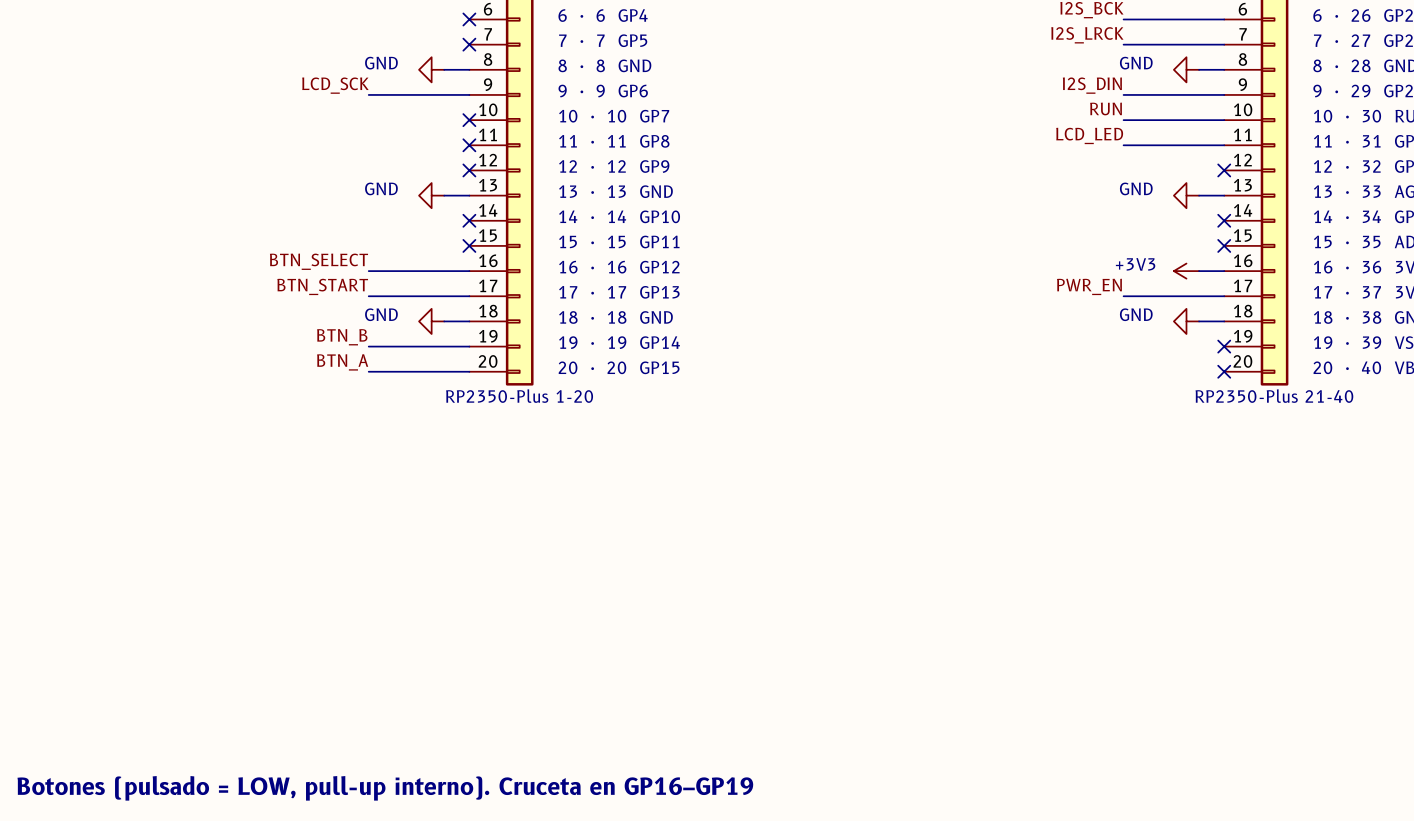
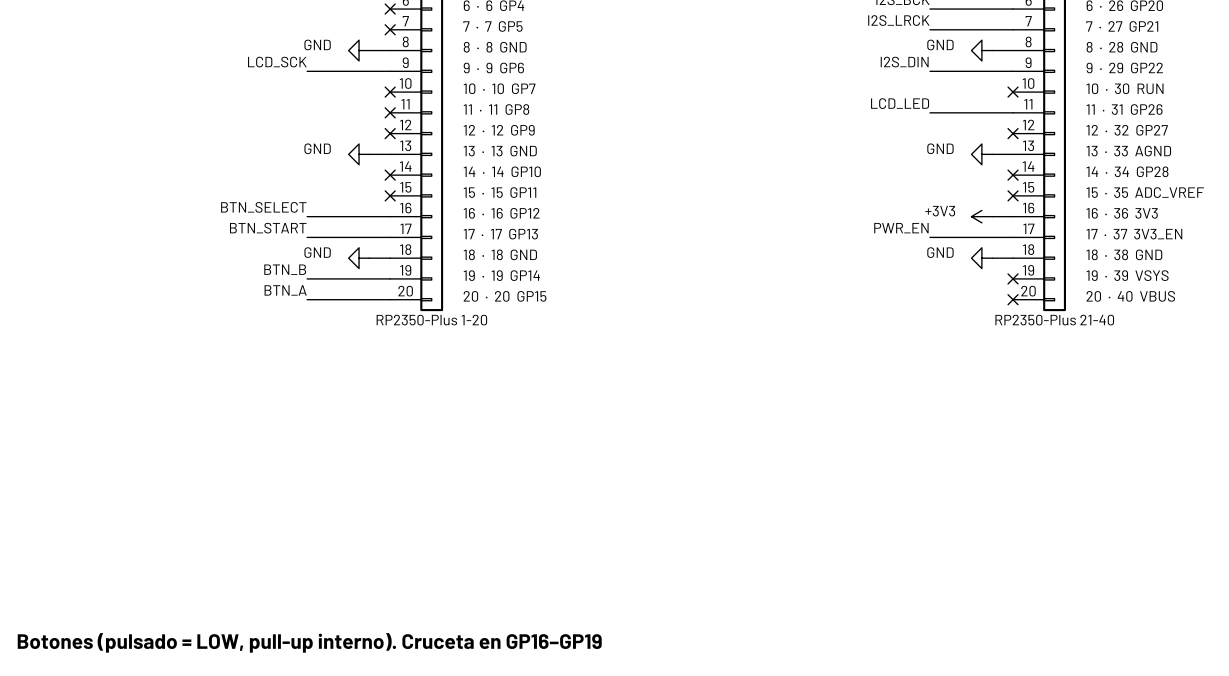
label: RUN (1106, 108) -> none
wire: (1123, 120) (1224, 120) -> none
no-connect mark: none -> (1013, 92)

